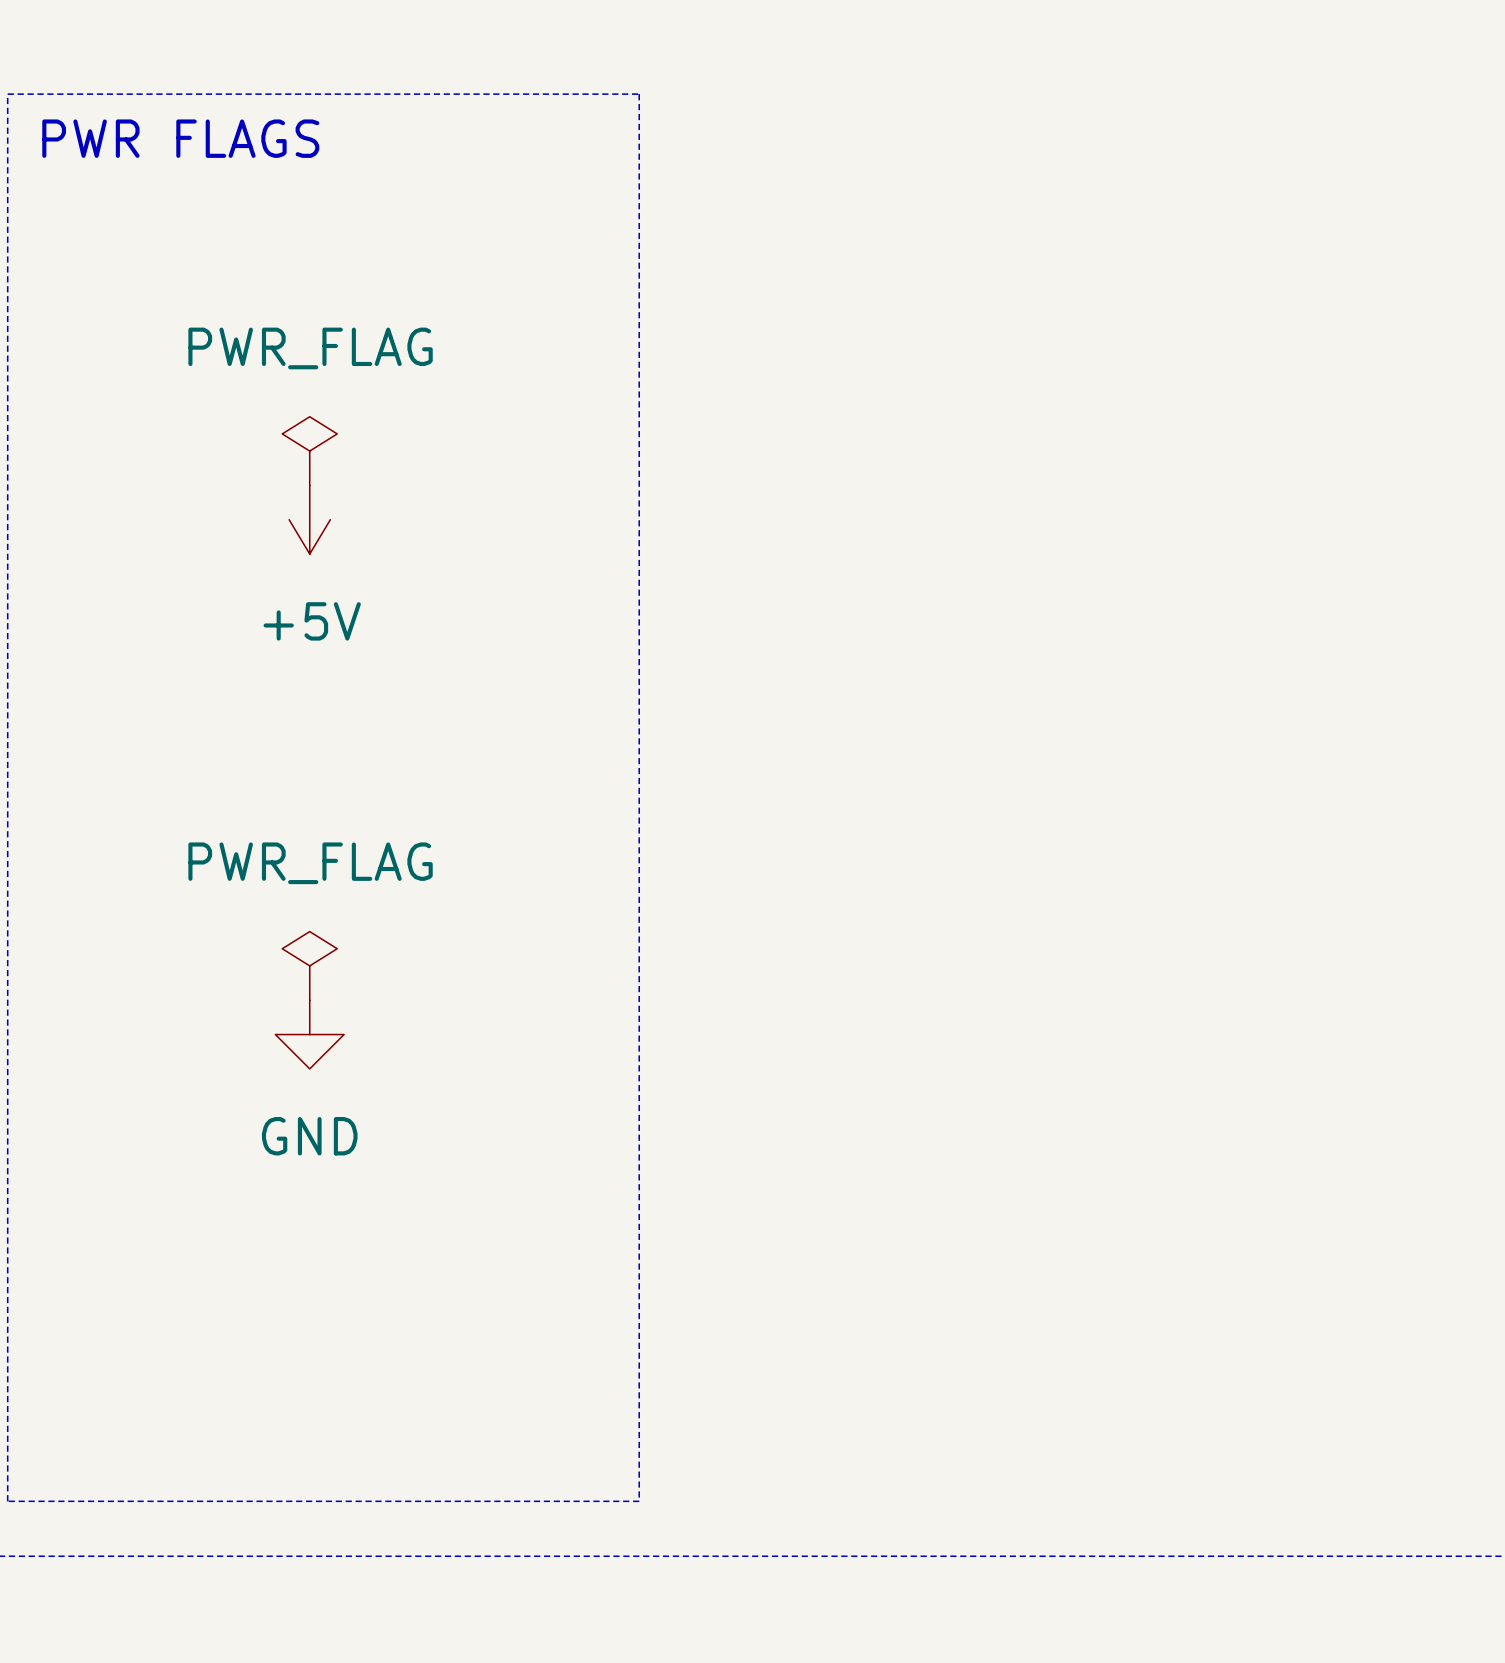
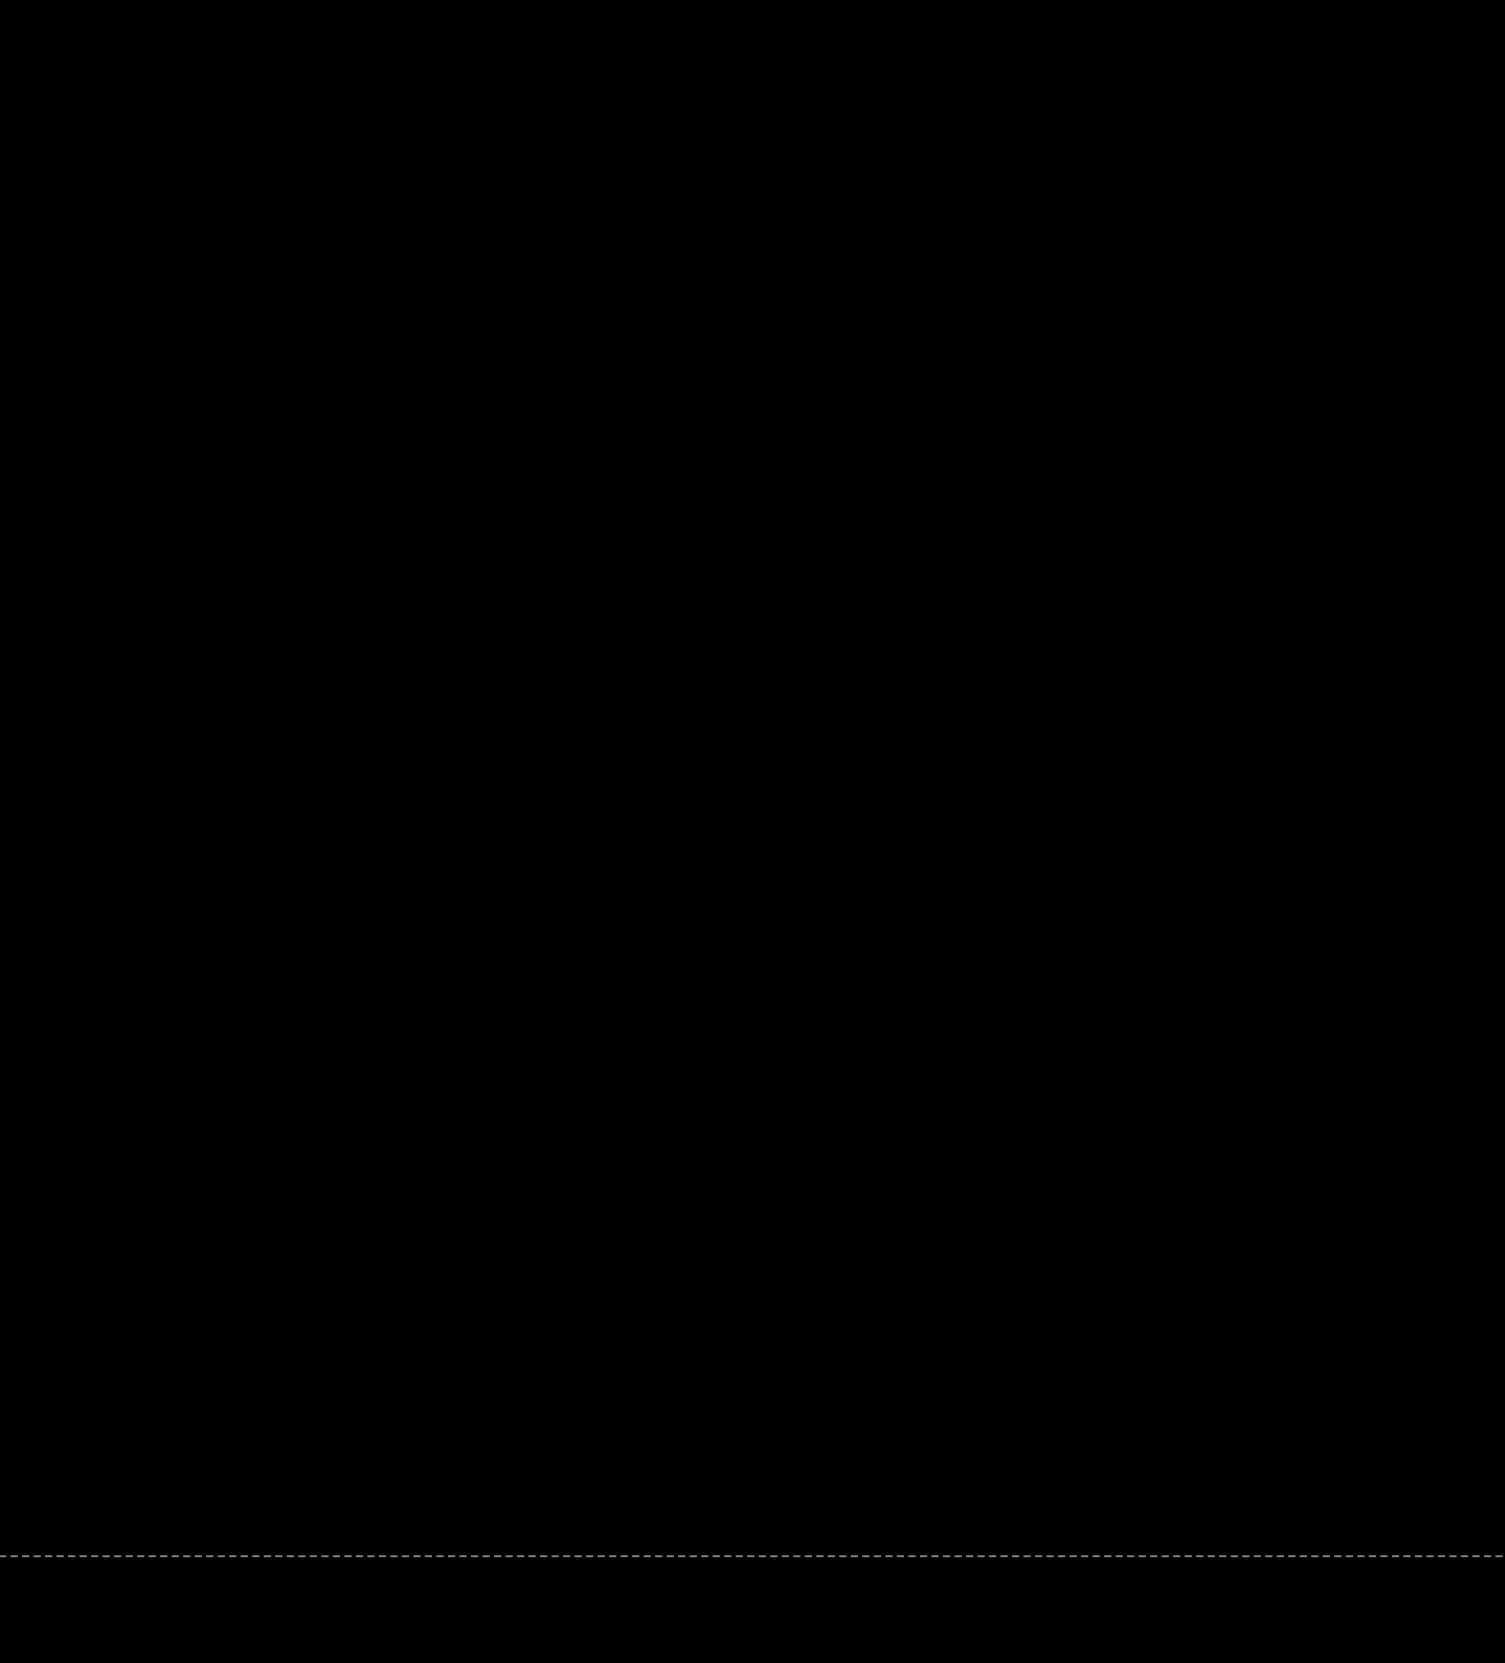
line: (7, 94) (639, 94) (639, 1501) (7, 1501) (7, 94) -> none
text: PWR FLAGS (180, 138) -> none
power symbol: PWR_FLAG (309, 451) -> none
power symbol: +5V (309, 519) -> none
power symbol: PWR_FLAG (309, 965) -> none
power symbol: GND (309, 1034) -> none

